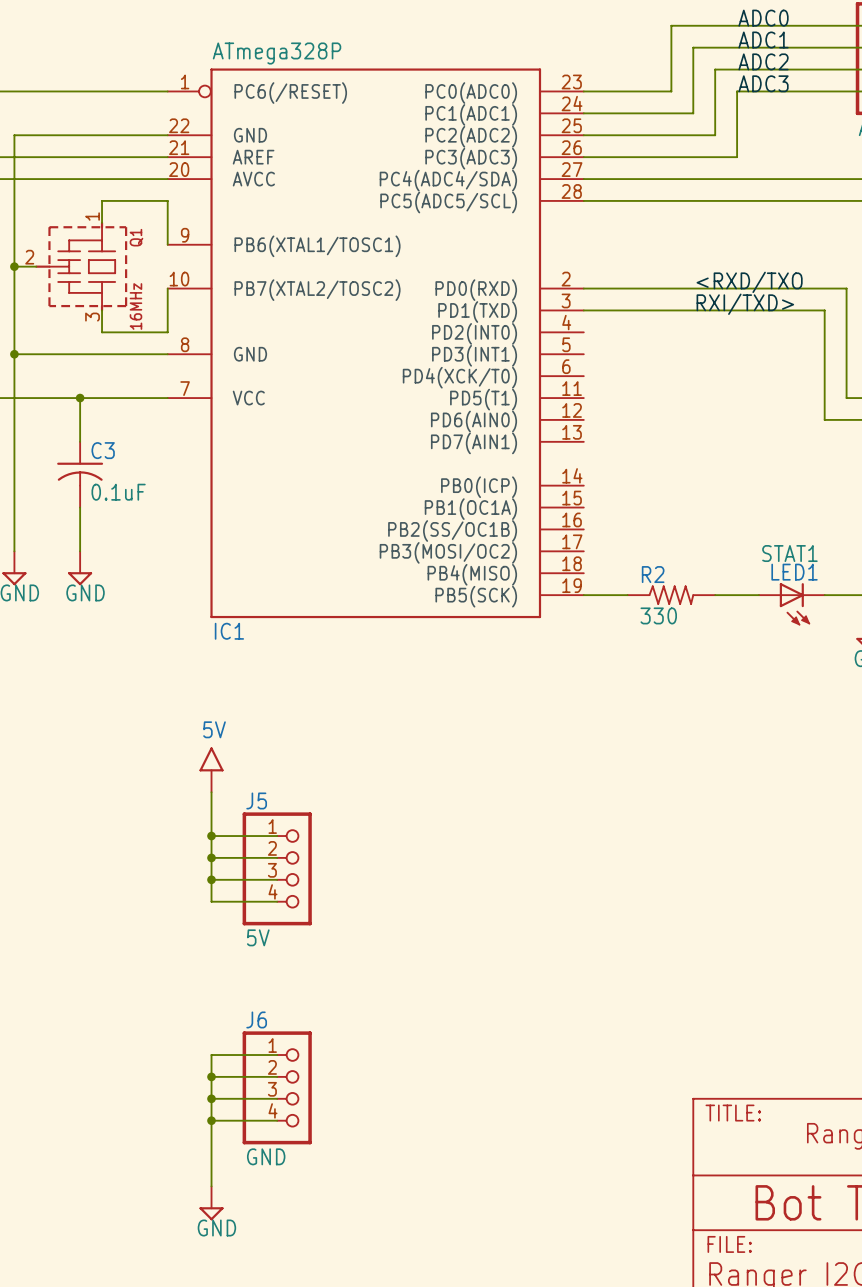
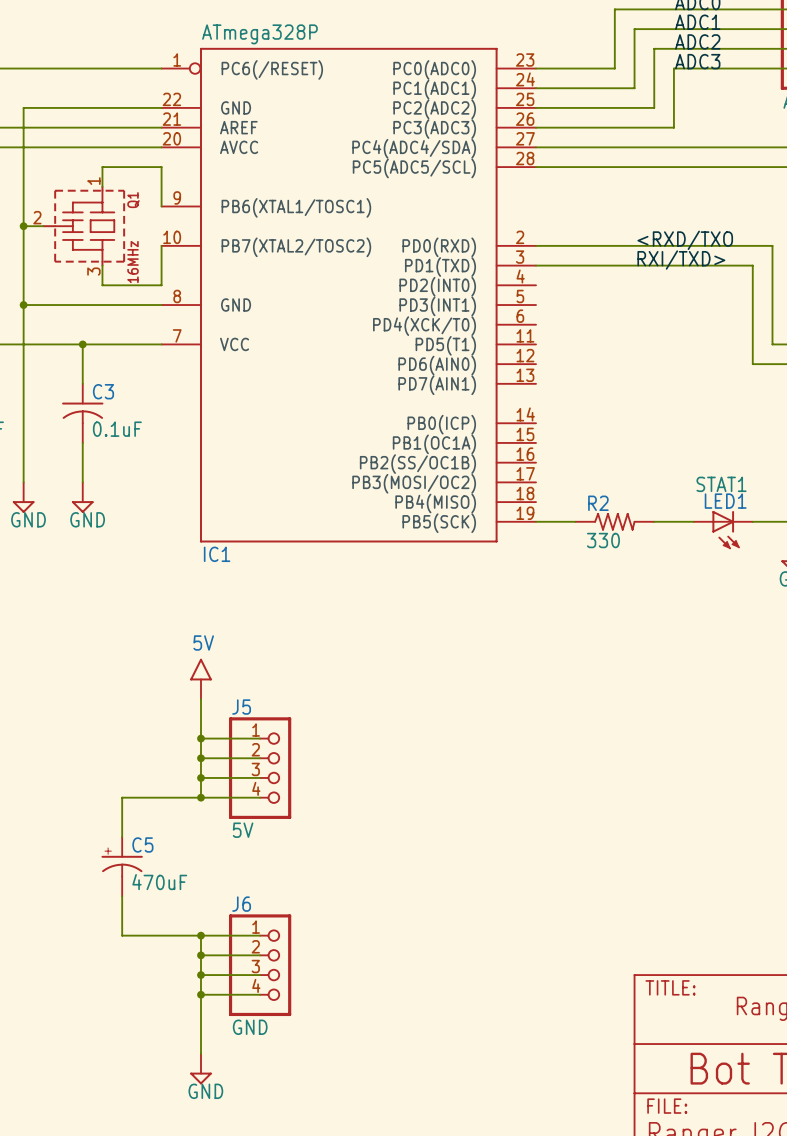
wire: none -> (200, 797) (122, 797) (122, 837)
junction: none -> (200, 797)
C5: none -> 470uF (122, 866)
wire: none -> (122, 896) (122, 935) (200, 935)
junction: none -> (200, 935)

